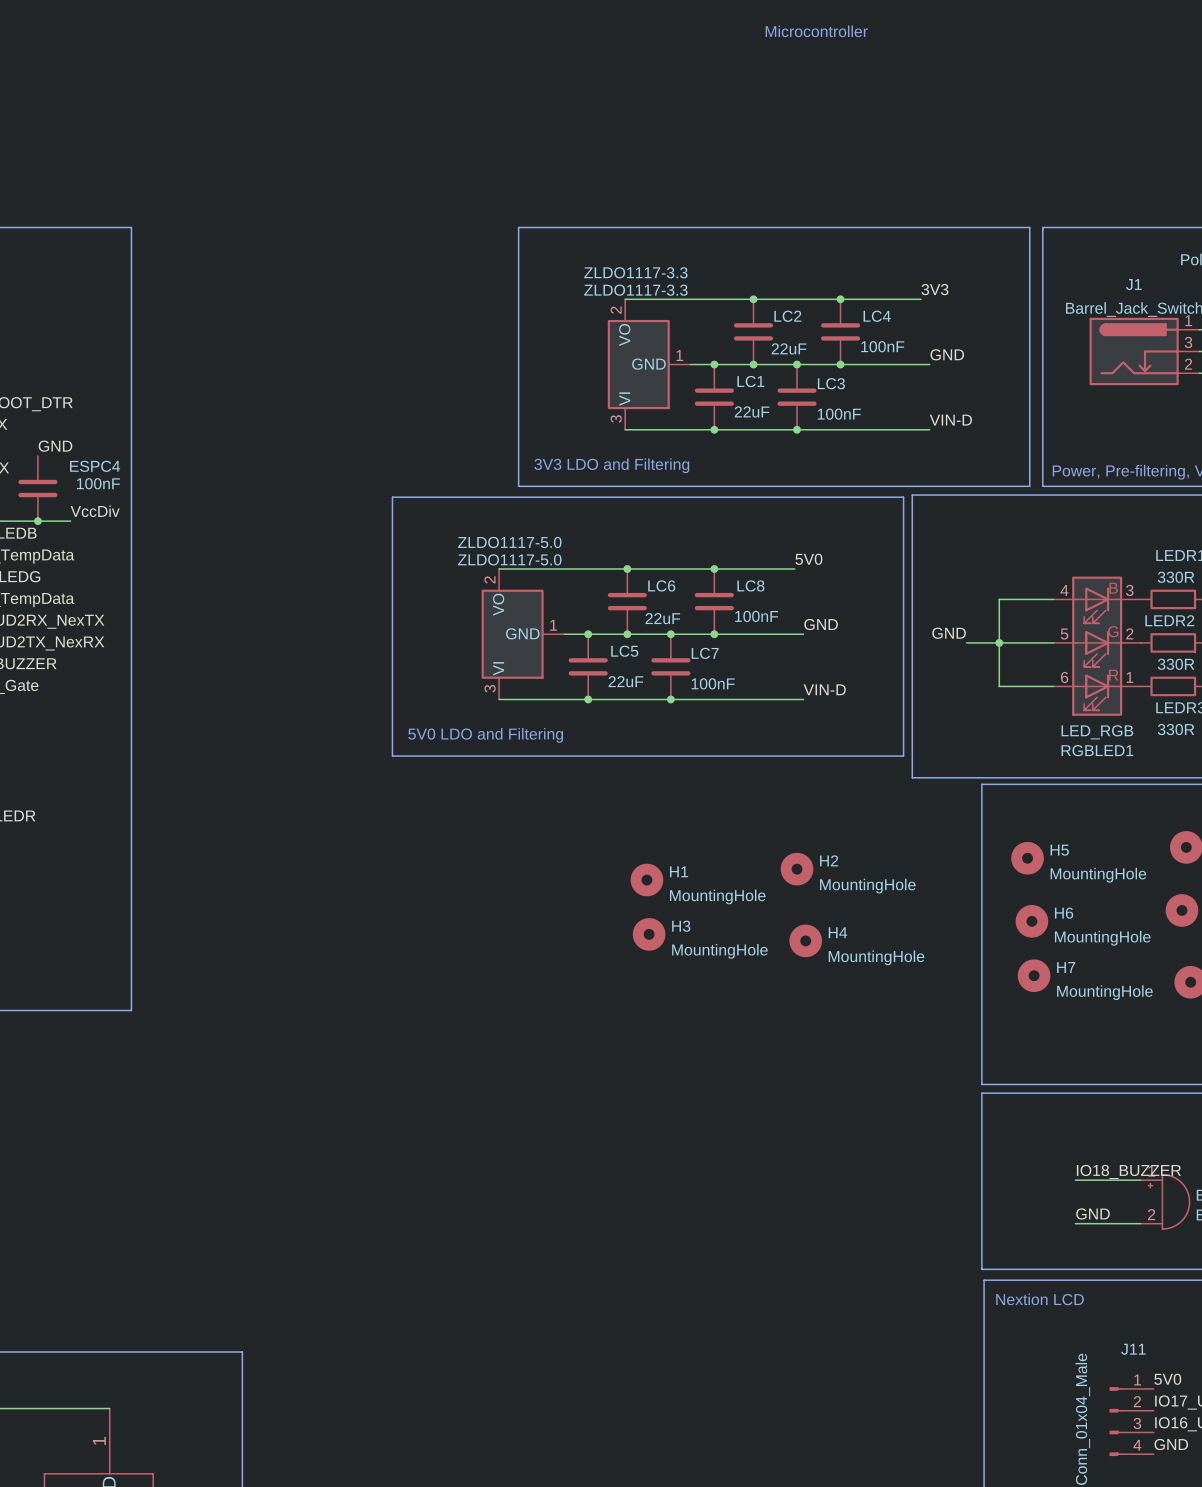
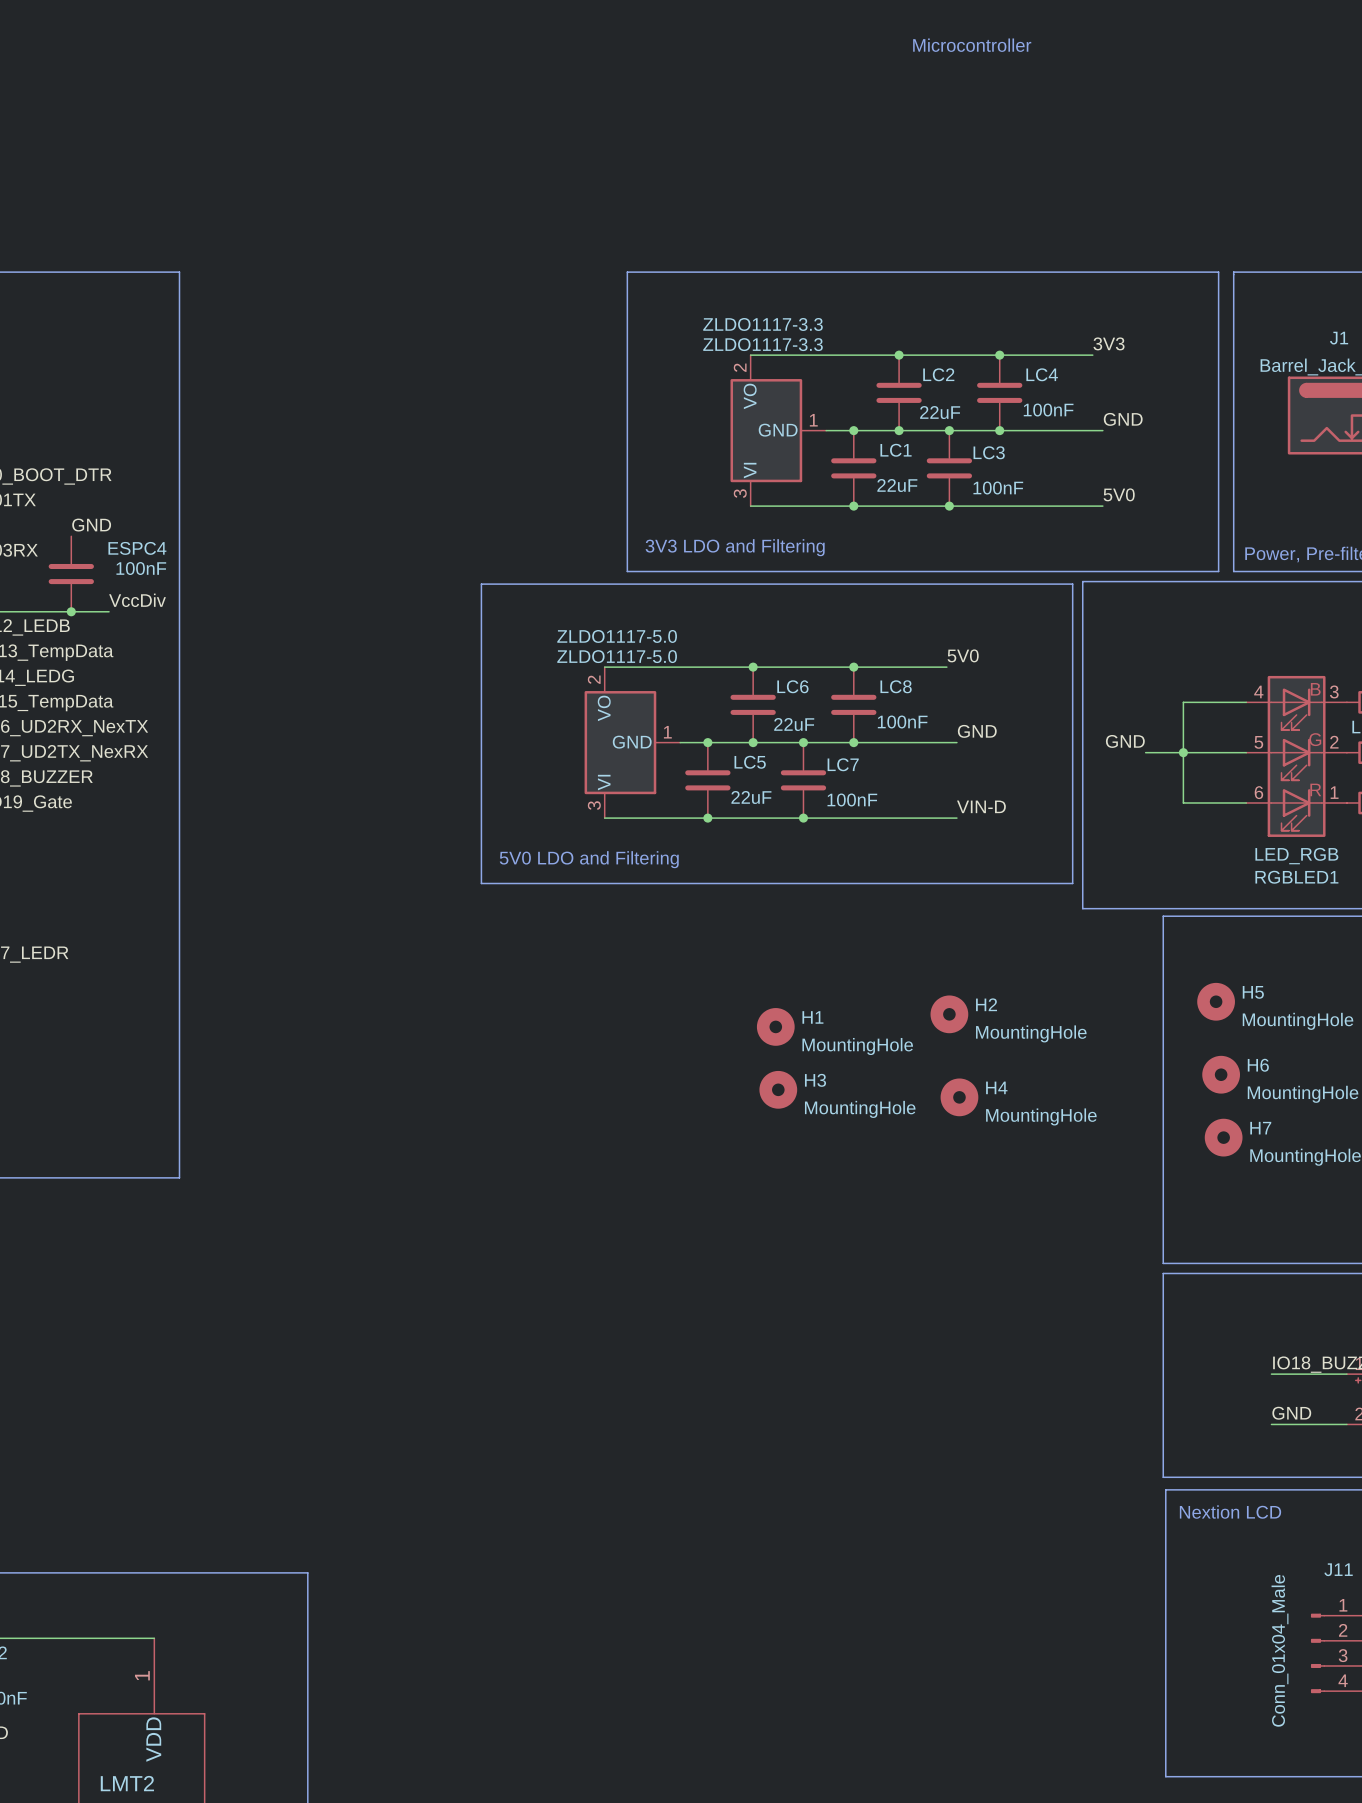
label: VIN-D (950, 420) -> 5V0 (1119, 494)

